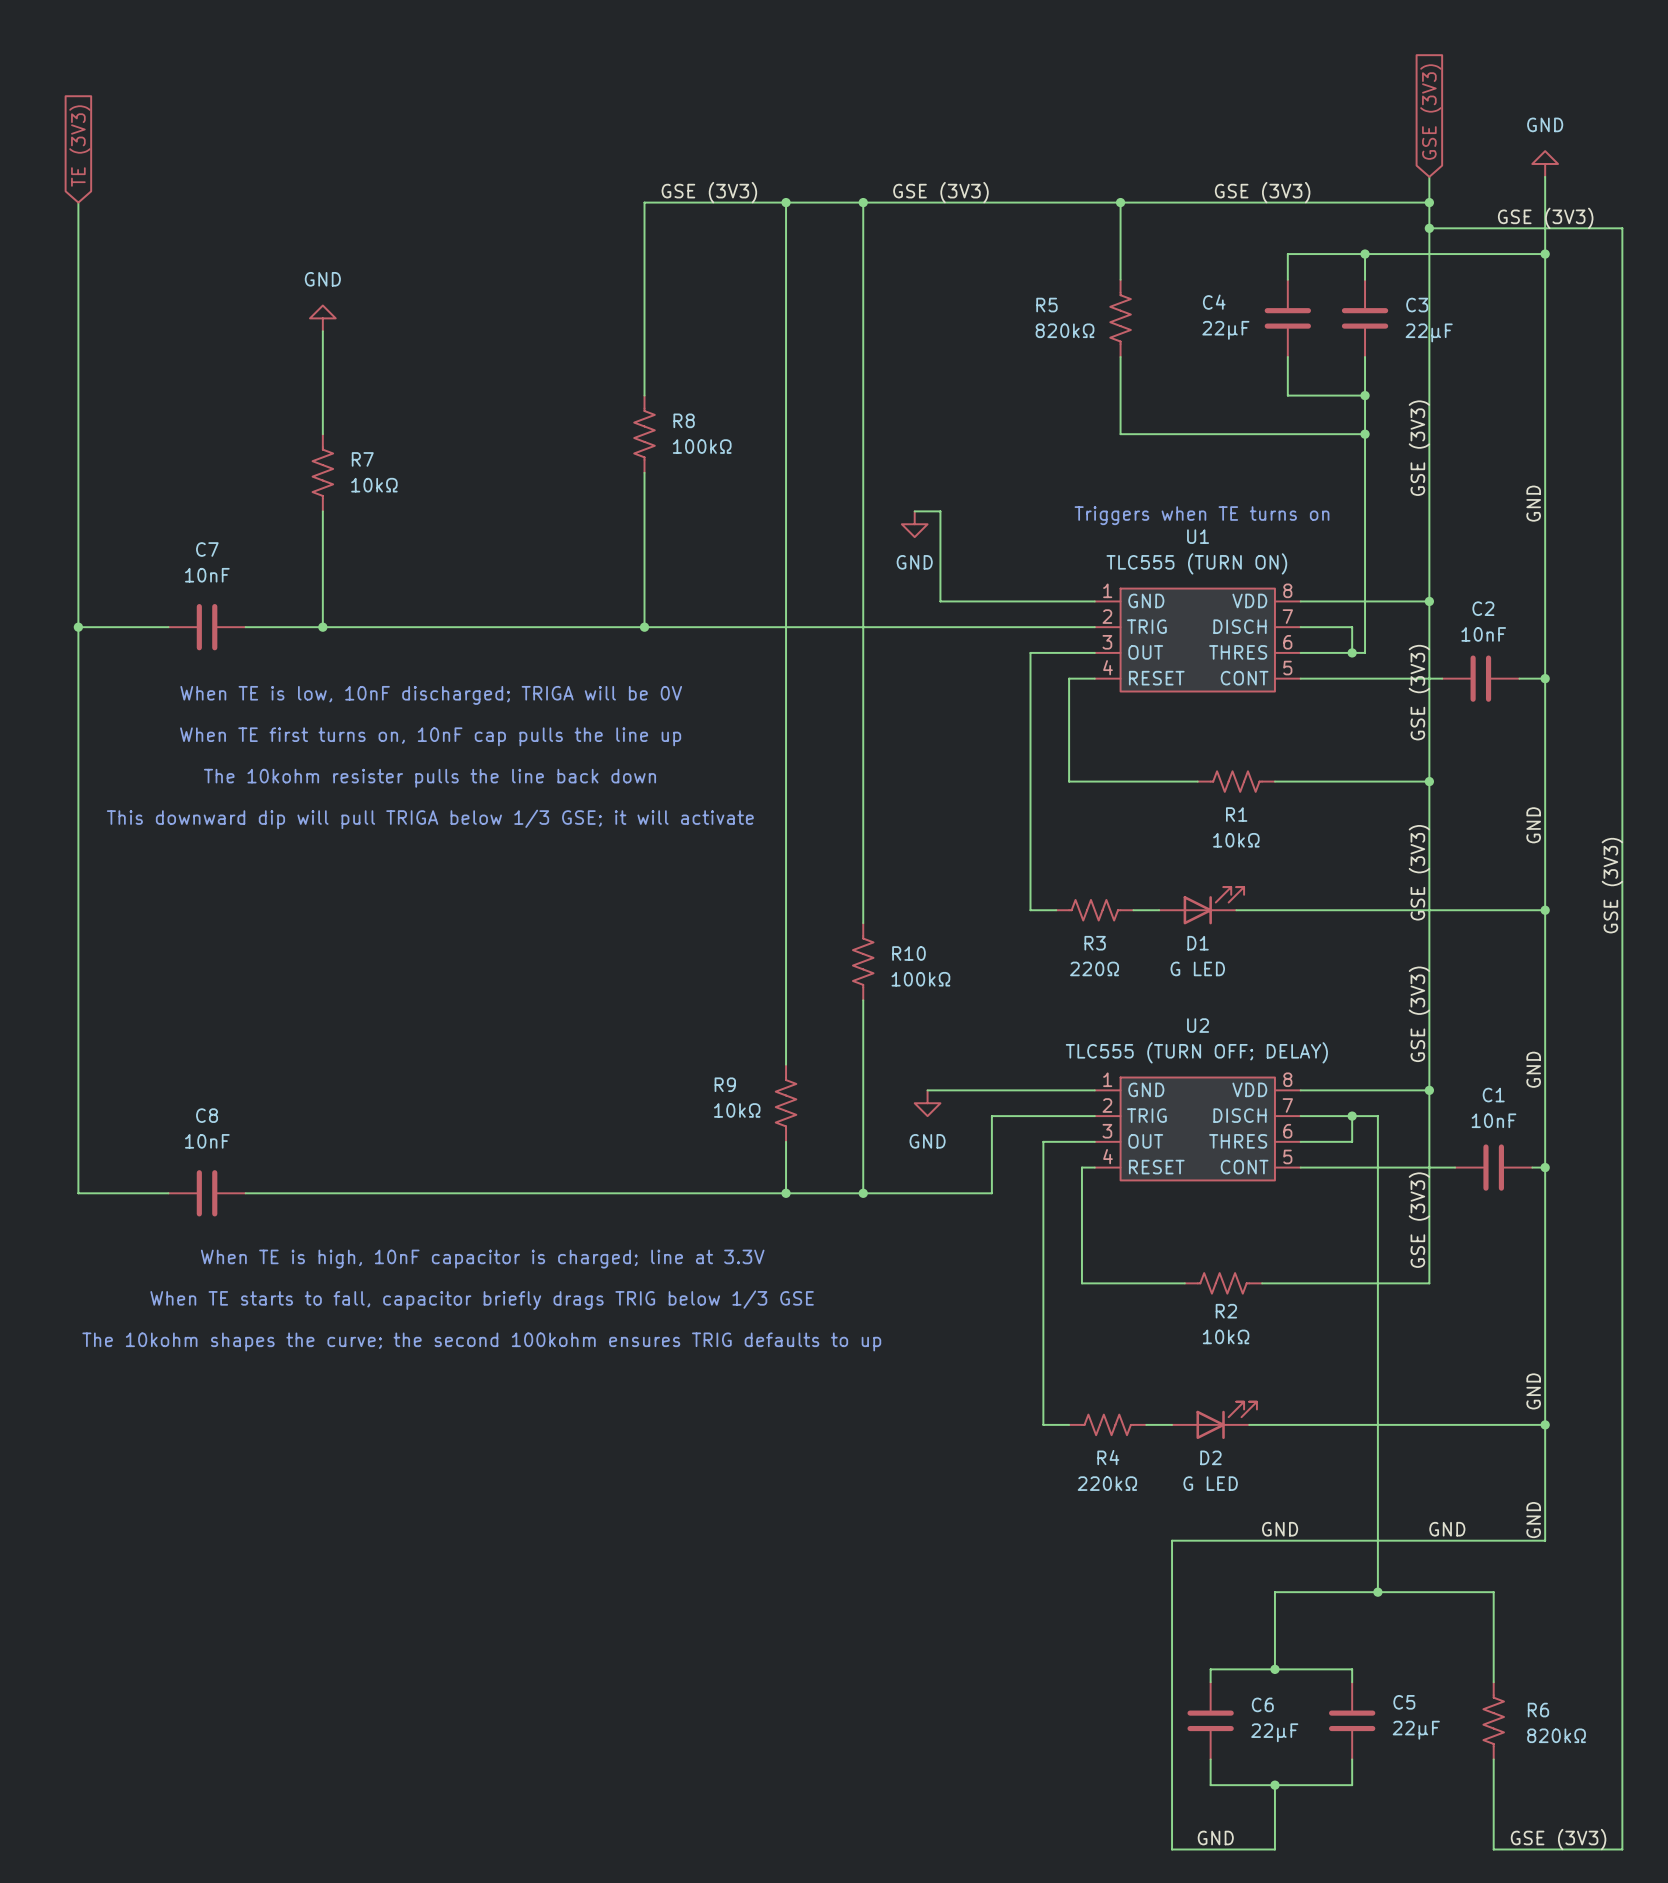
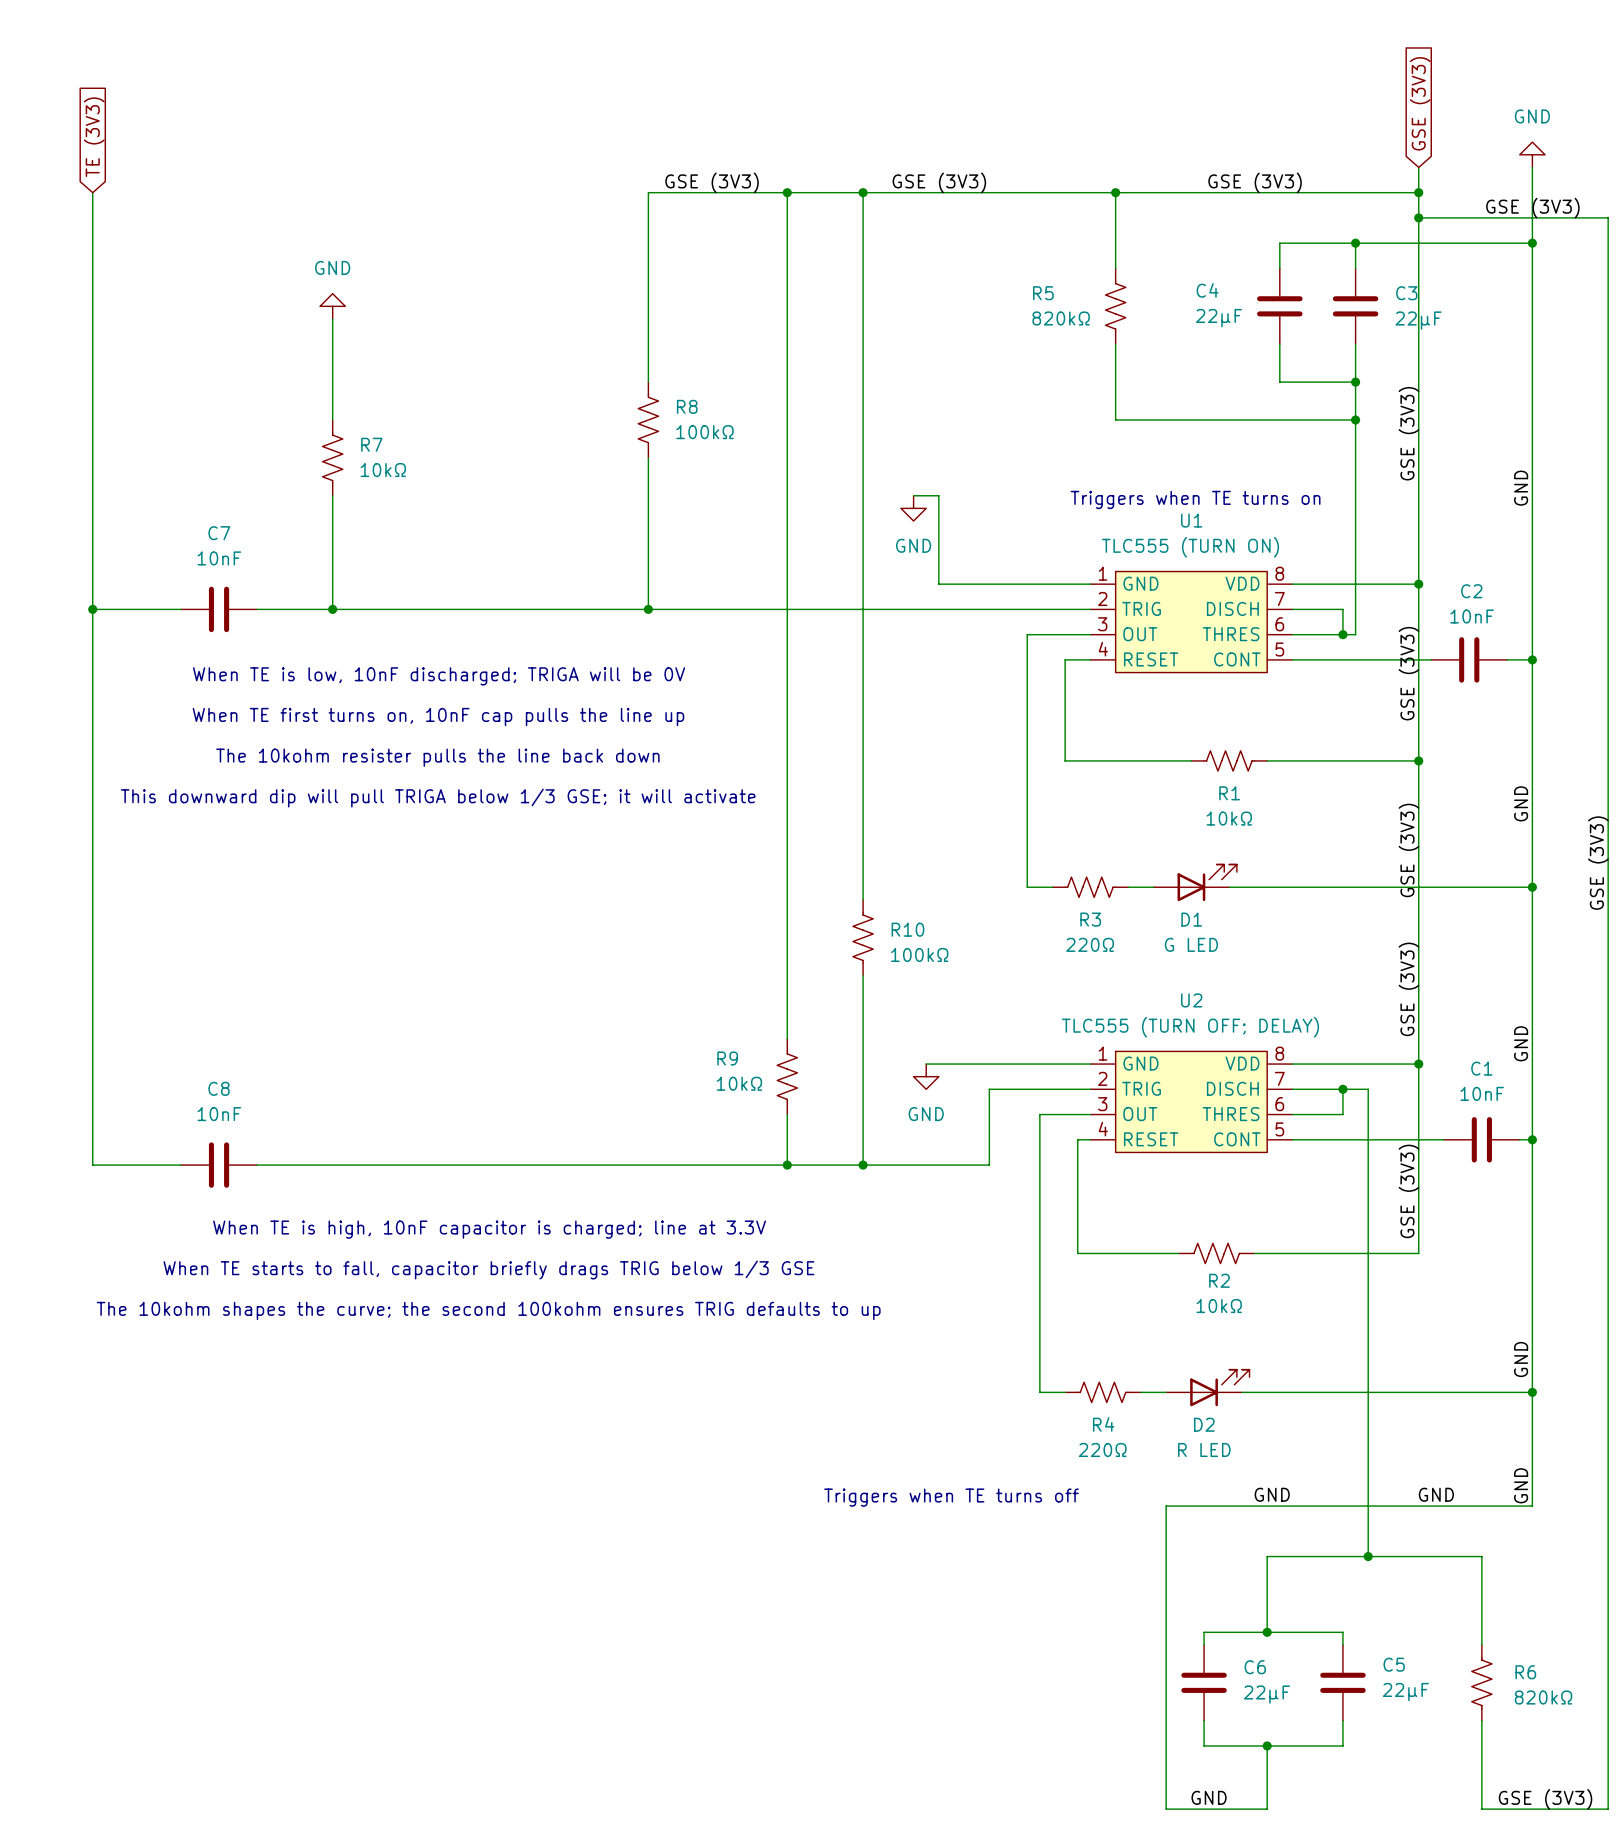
R4 value: 220kΩ (1107, 1483) -> 220Ω (1102, 1450)
D2 value: G LED (1210, 1483) -> R LED (1204, 1450)
text: none -> Triggers when TE turns off (951, 1497)

